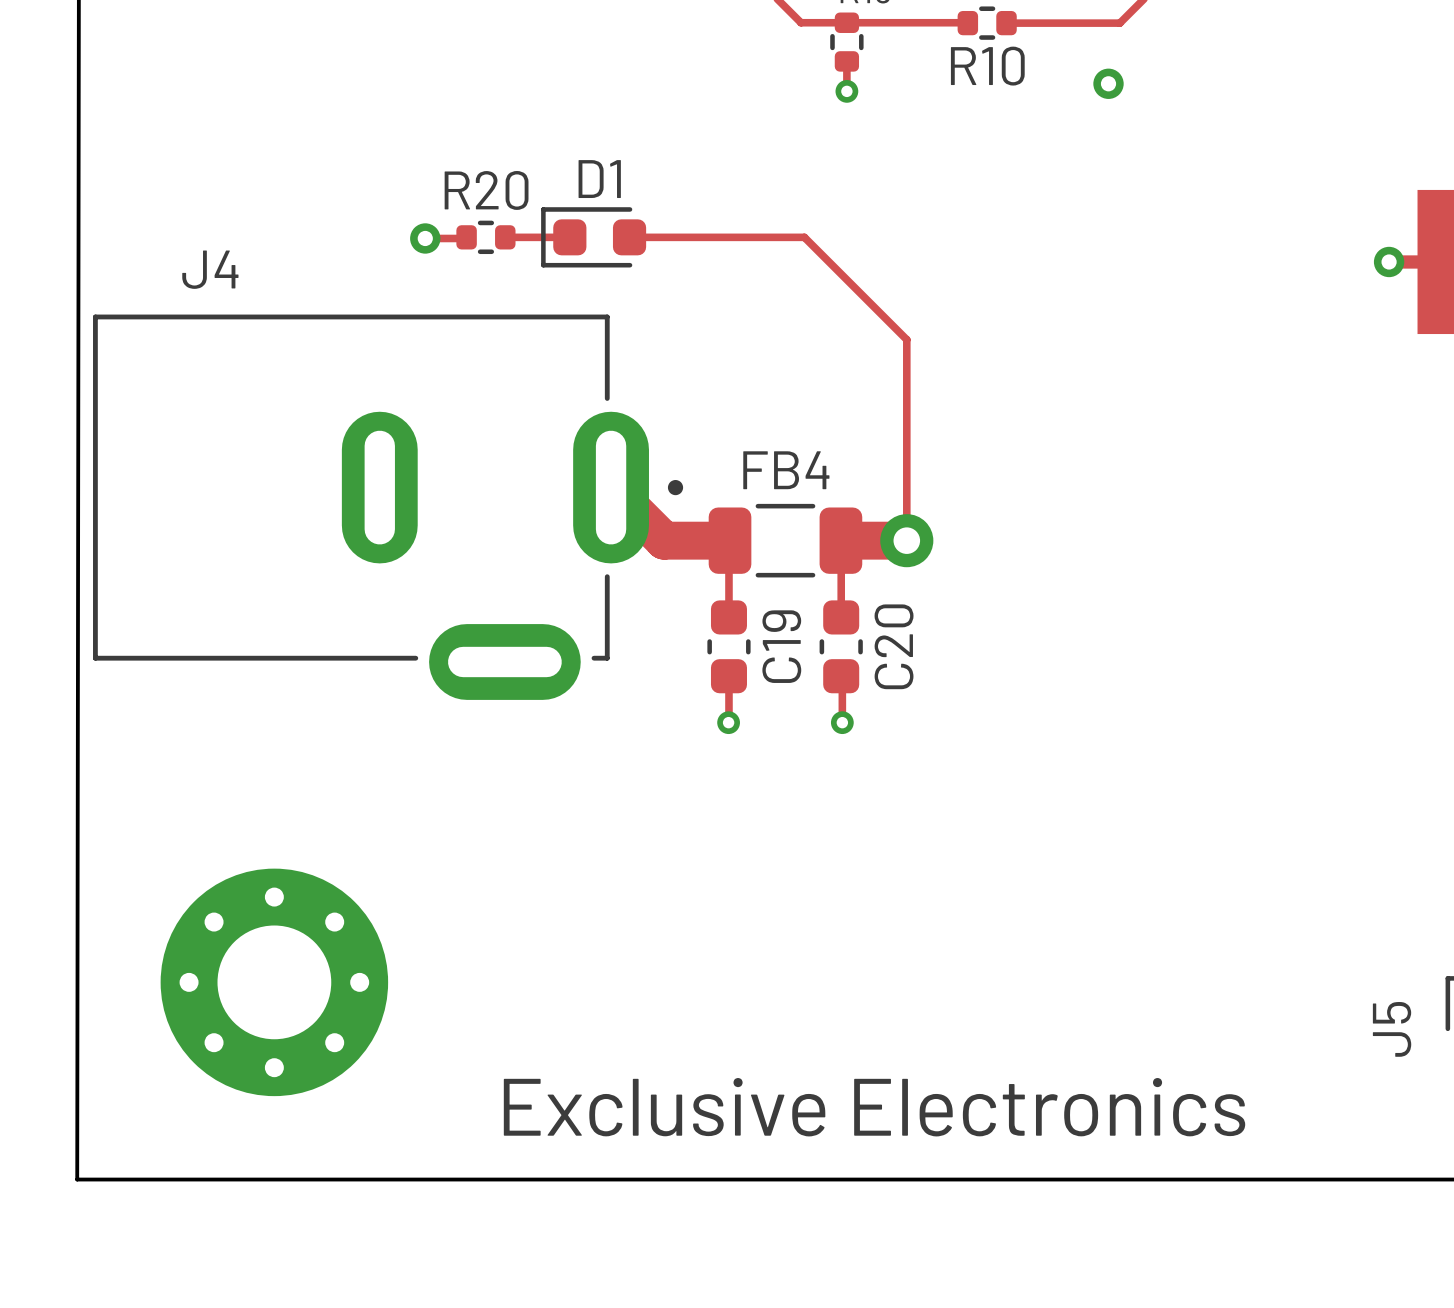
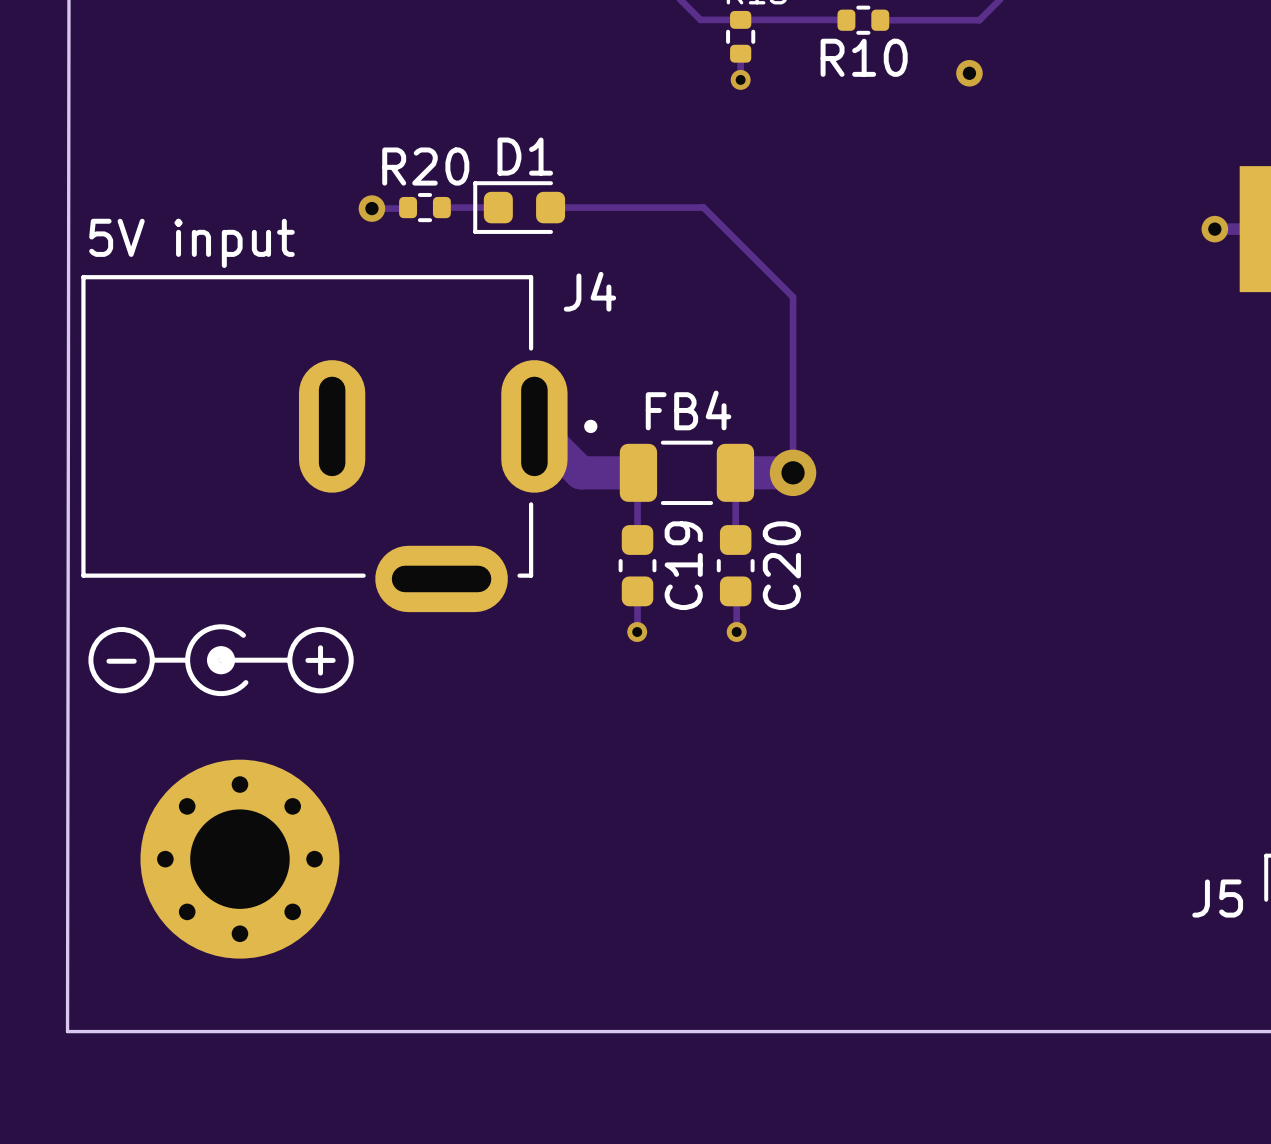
J4 name position: J4 (210, 269) -> J4 (589, 291)
text: none -> 5V input (191, 243)
drawing: none -> [88, 624, 354, 697]
text: none -> + (320, 660)
text: none -> - (121, 661)
J5 name rotation: 0° (1392, 1029) -> 90° clockwise (1217, 898)
text: Exclusive Electronics (874, 1107) -> none

